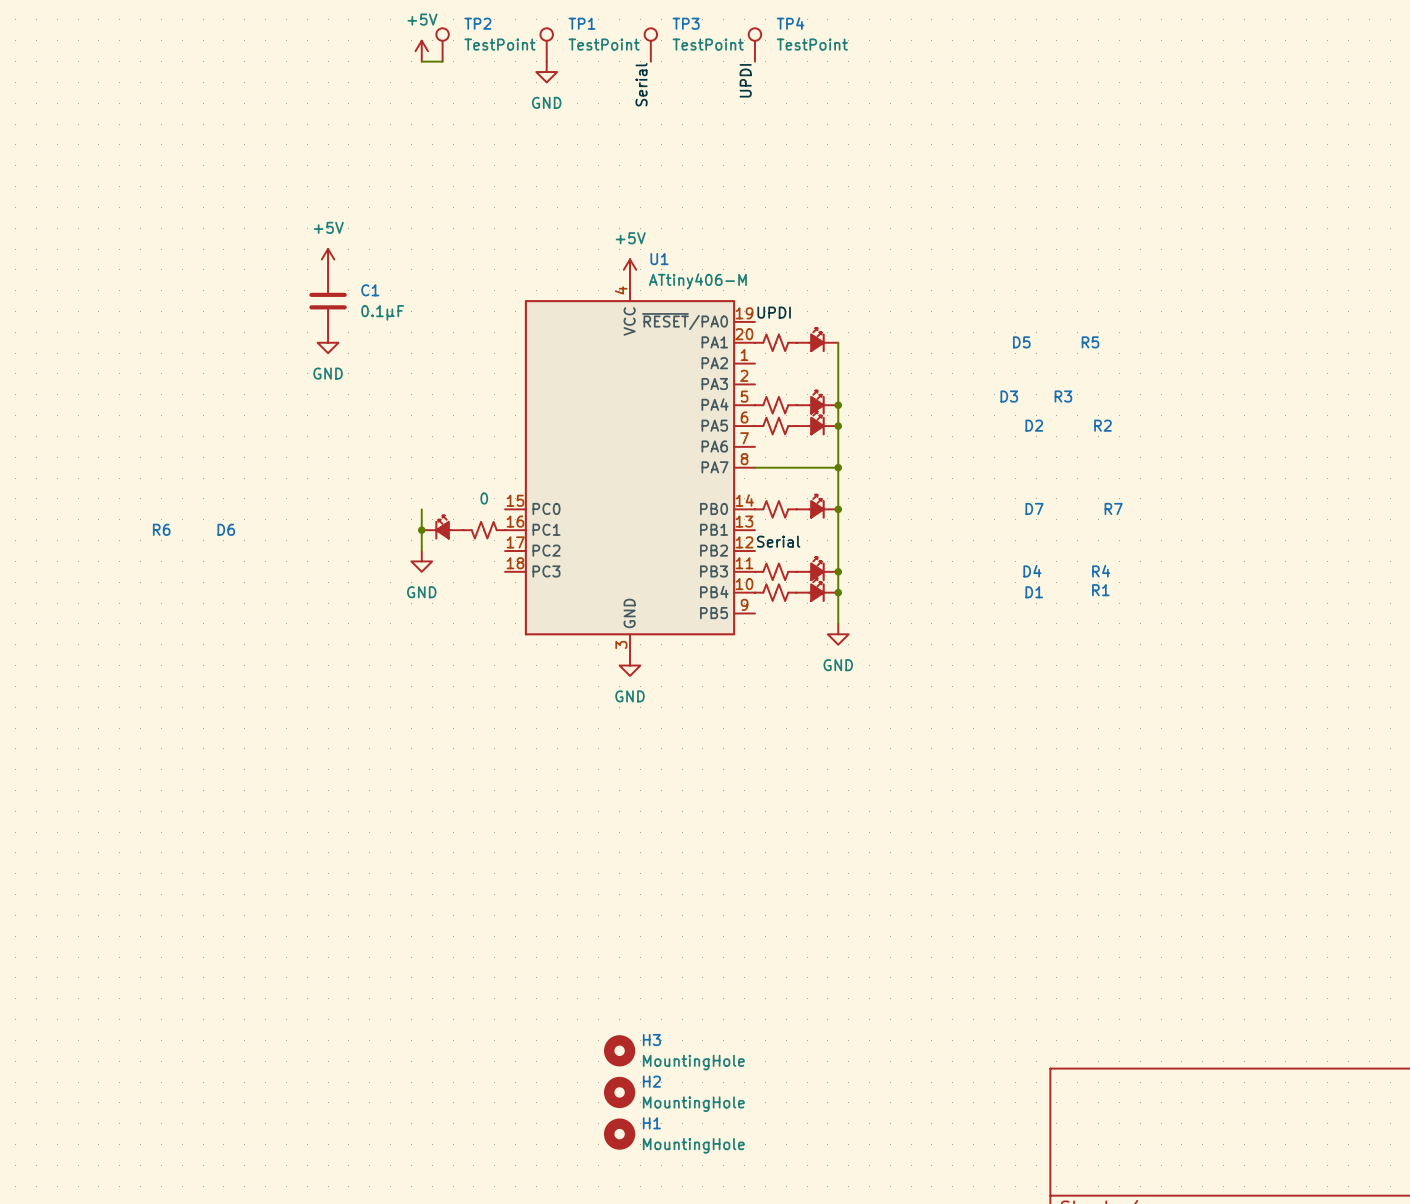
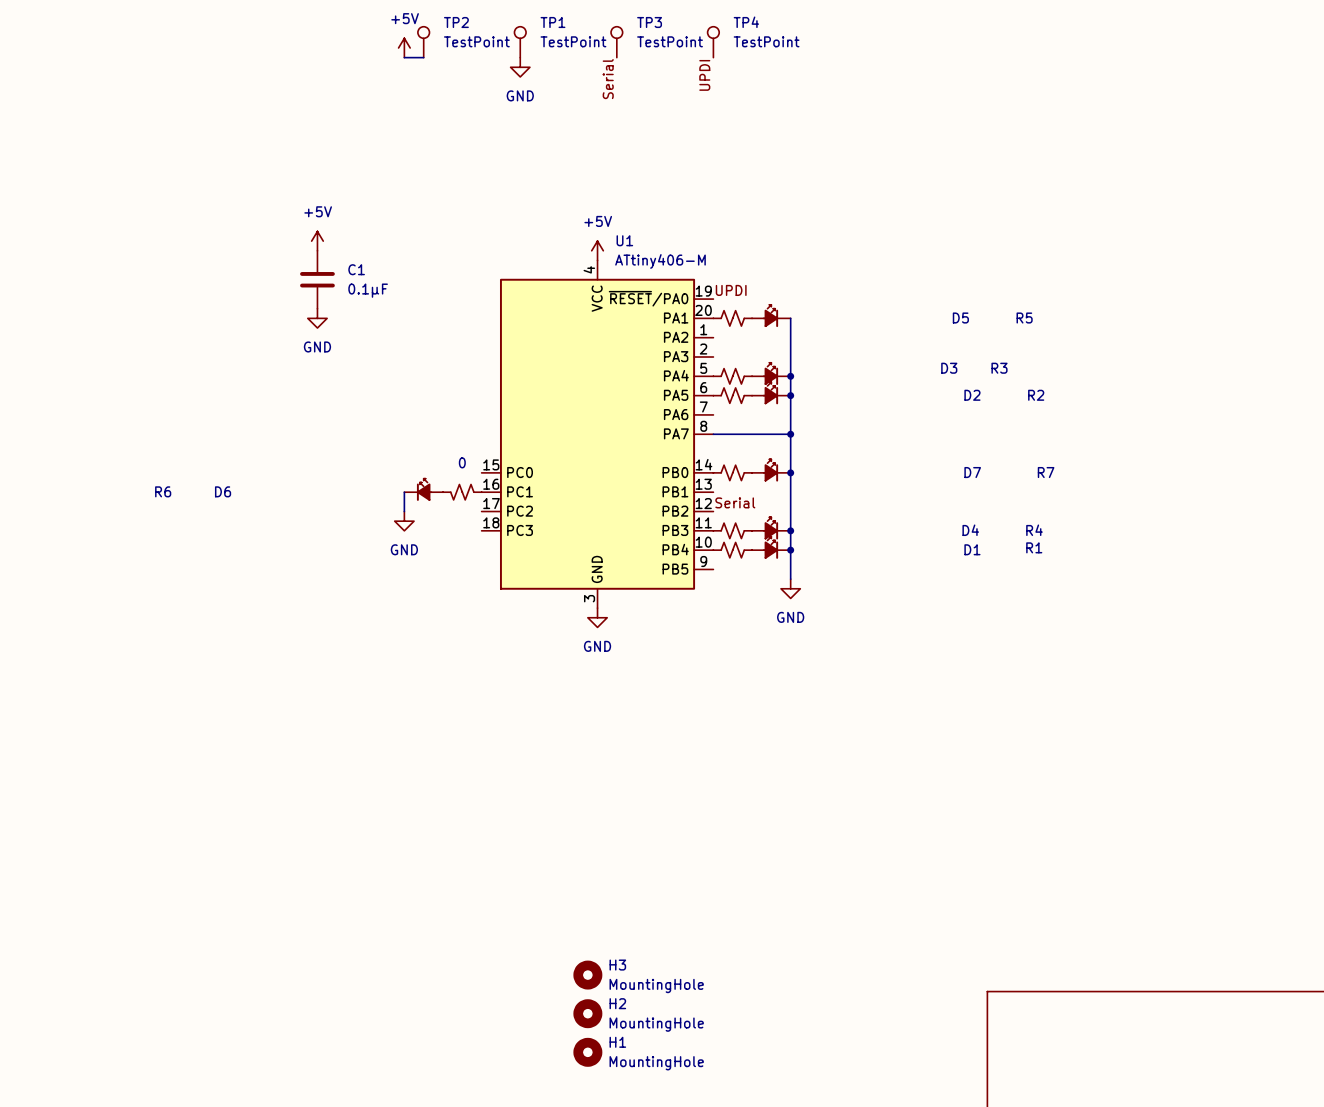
wire: (421, 509) (421, 530) -> none
junction: (421, 530) -> none

